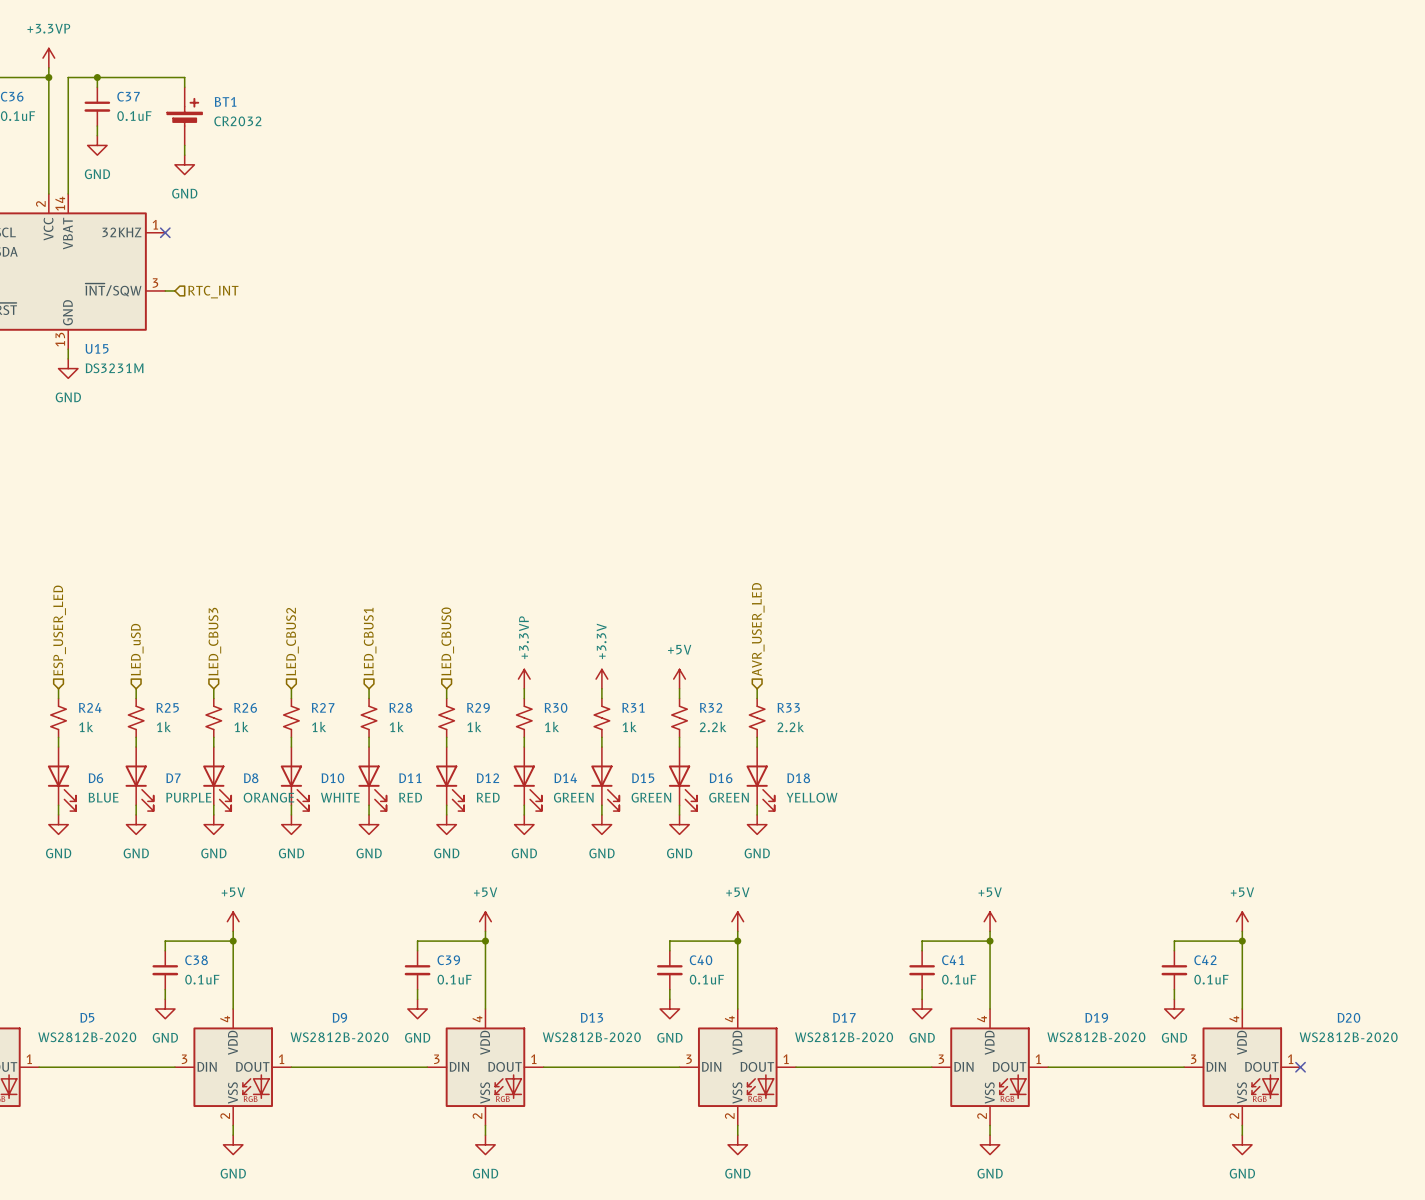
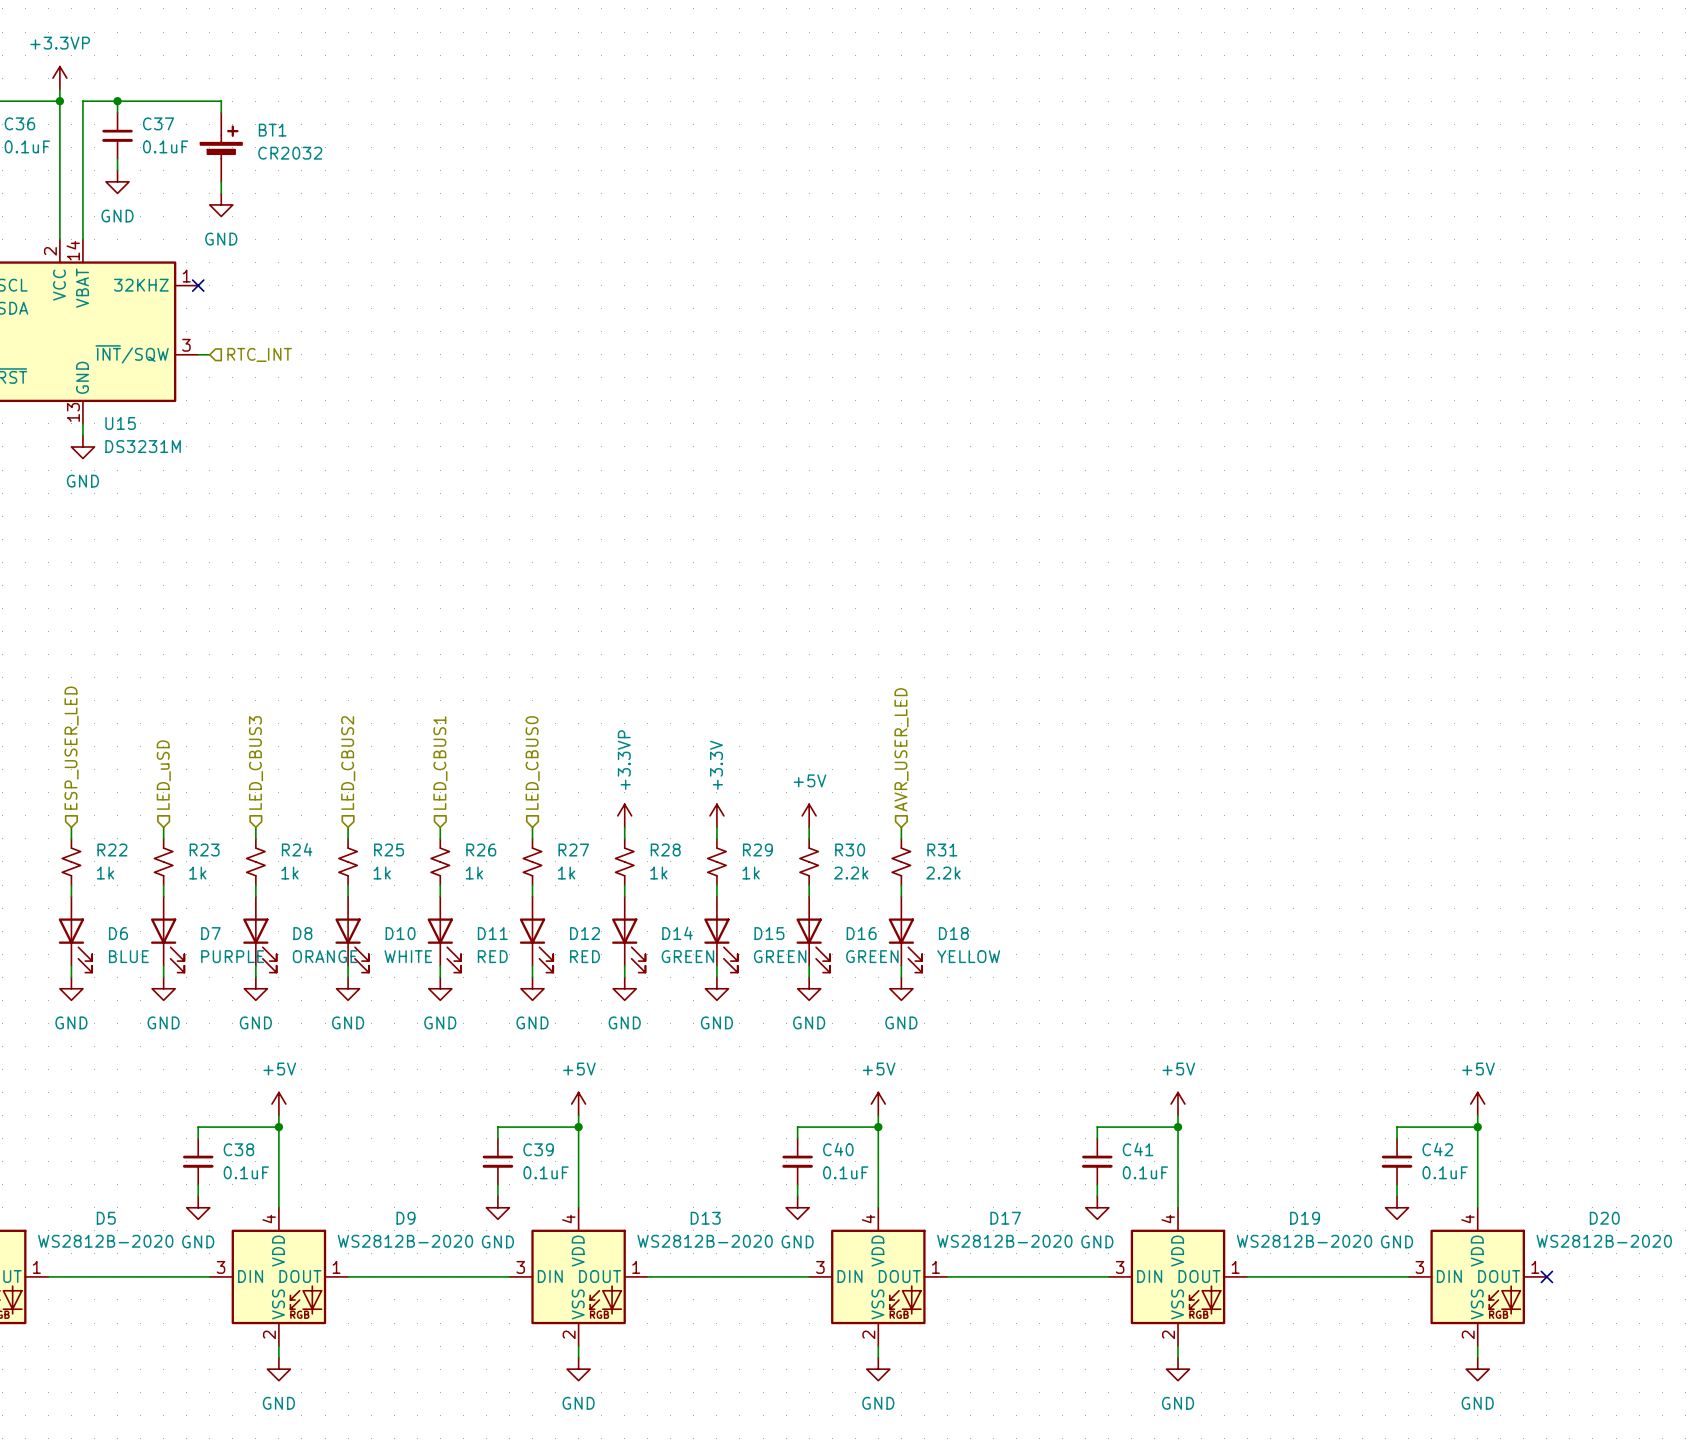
R24 name: R24 (90, 707) -> R22 (112, 850)
R25 name: R25 (167, 707) -> R23 (204, 850)
R26 name: R26 (245, 707) -> R24 (297, 849)
R27 name: R27 (323, 707) -> R25 (389, 850)
R28 name: R28 (400, 707) -> R26 (481, 850)
R29 name: R29 (478, 707) -> R27 (573, 850)
R30 name: R30 (556, 707) -> R28 (665, 850)
R31 name: R31 (633, 707) -> R29 (757, 850)
R32 name: R32 (711, 707) -> R30 (850, 850)
R33 name: R33 (788, 707) -> R31 (942, 850)

